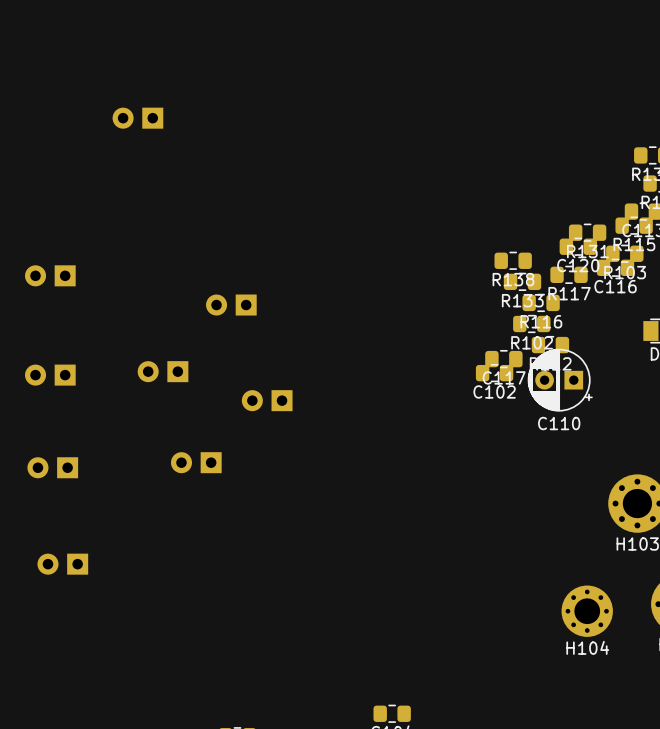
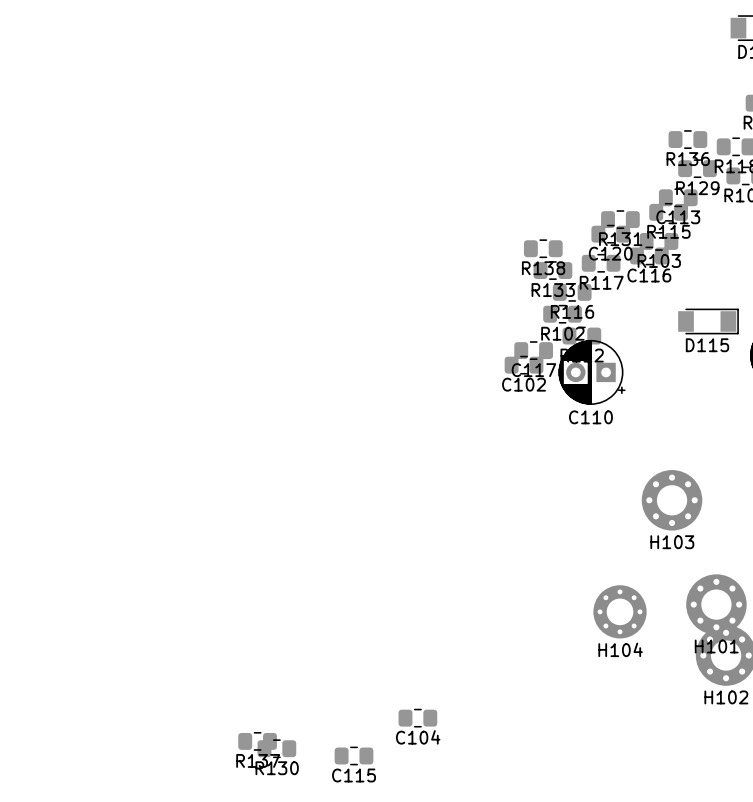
part: (137, 118) -> none
part: (50, 275) -> none
part: (231, 305) -> none
part: (163, 371) -> none
part: (50, 375) -> none
part: (267, 400) -> none
part: (196, 462) -> none
part: (52, 467) -> none
part: (62, 564) -> none

